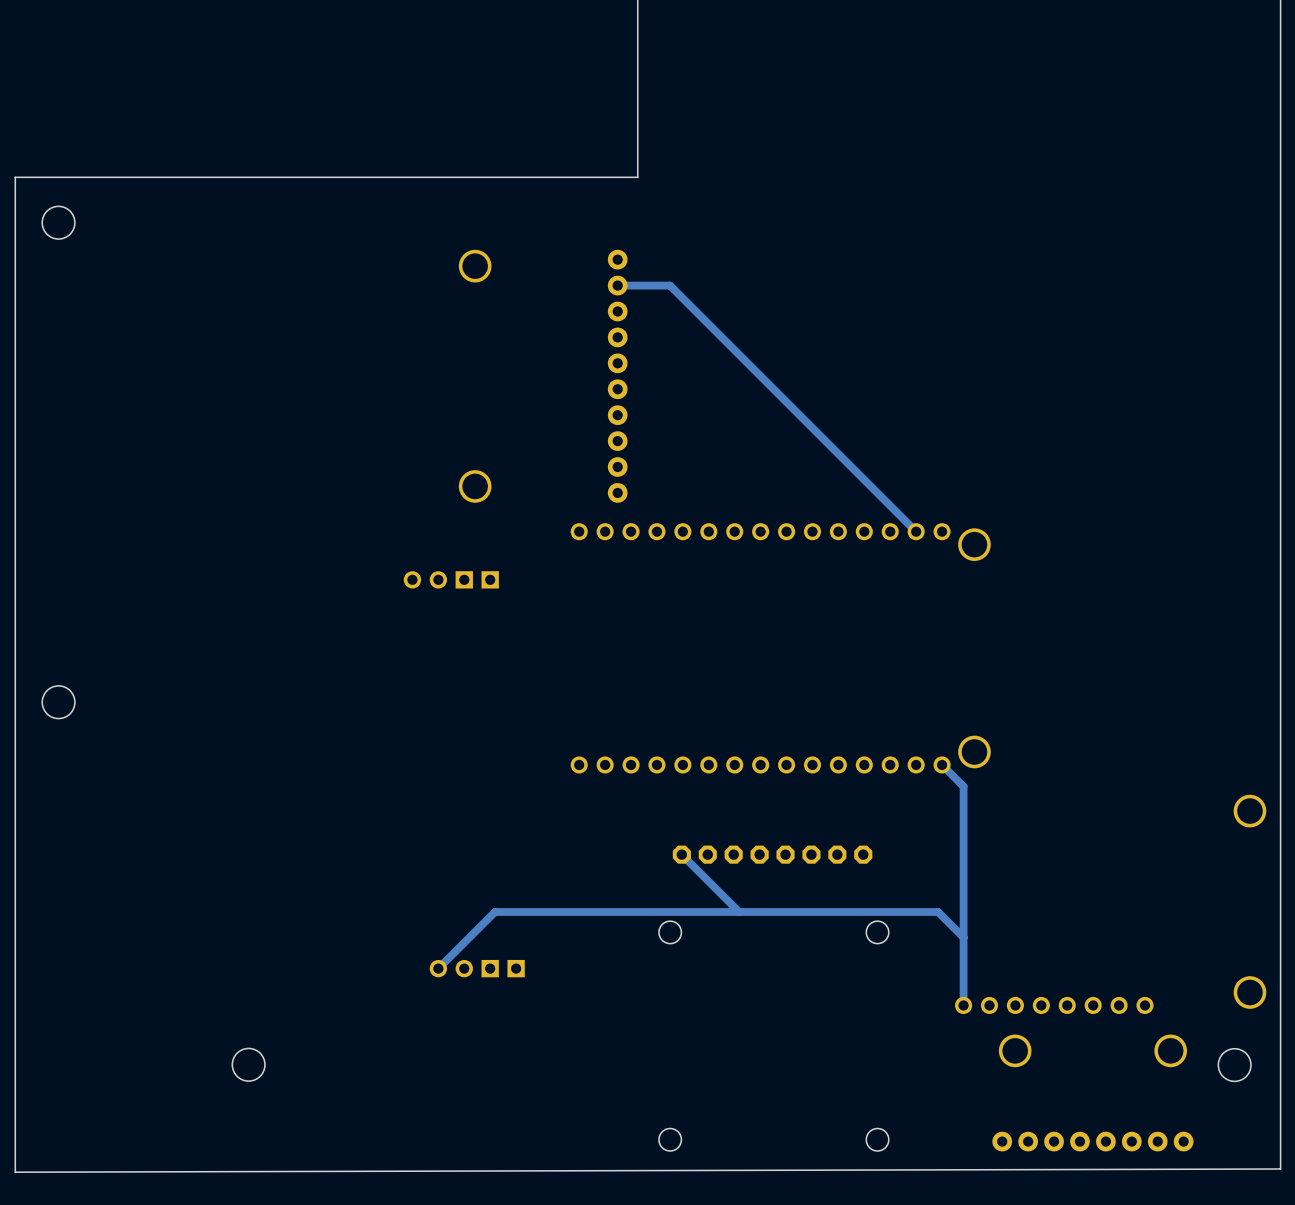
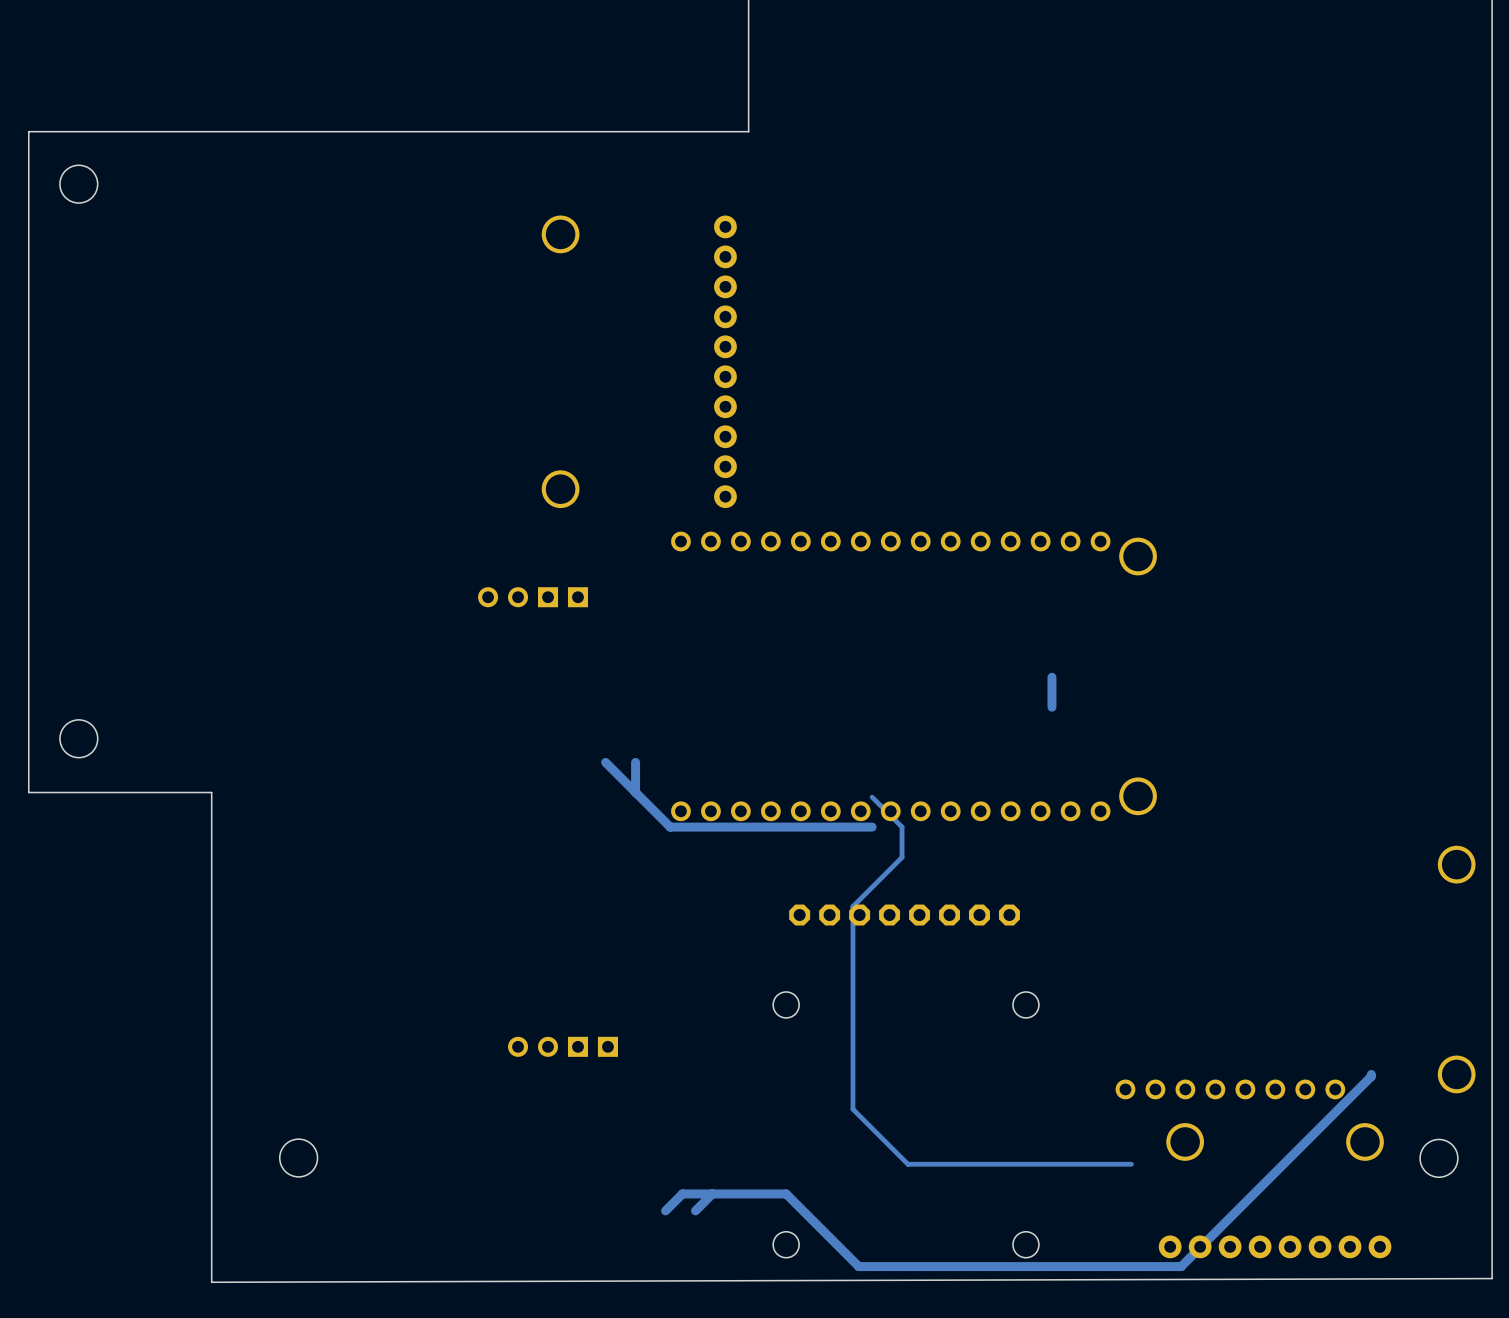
track: (617, 285) (670, 285) (916, 531) -> none
track: none -> (1051, 677) (1051, 707)
track: none -> (605, 762) (670, 827) (872, 827)
track: none -> (635, 762) (635, 792)
board edge: (15, 748) (15, 1172) (1280, 1169) -> (28, 792) (211, 792) (211, 1282) (1492, 1278)
track: none -> (872, 797) (902, 827) (902, 857) (852, 906) (852, 1109) (907, 1164) (1131, 1164)
track: (942, 764) (963, 786) (963, 1005) -> none
track: (681, 854) (739, 911) -> none
track: (963, 937) (938, 911) (494, 911) (438, 968) -> none
track: none -> (1371, 1074) (1181, 1266) (858, 1266) (786, 1193) (682, 1193) (665, 1210)
track: none -> (712, 1193) (695, 1210)

